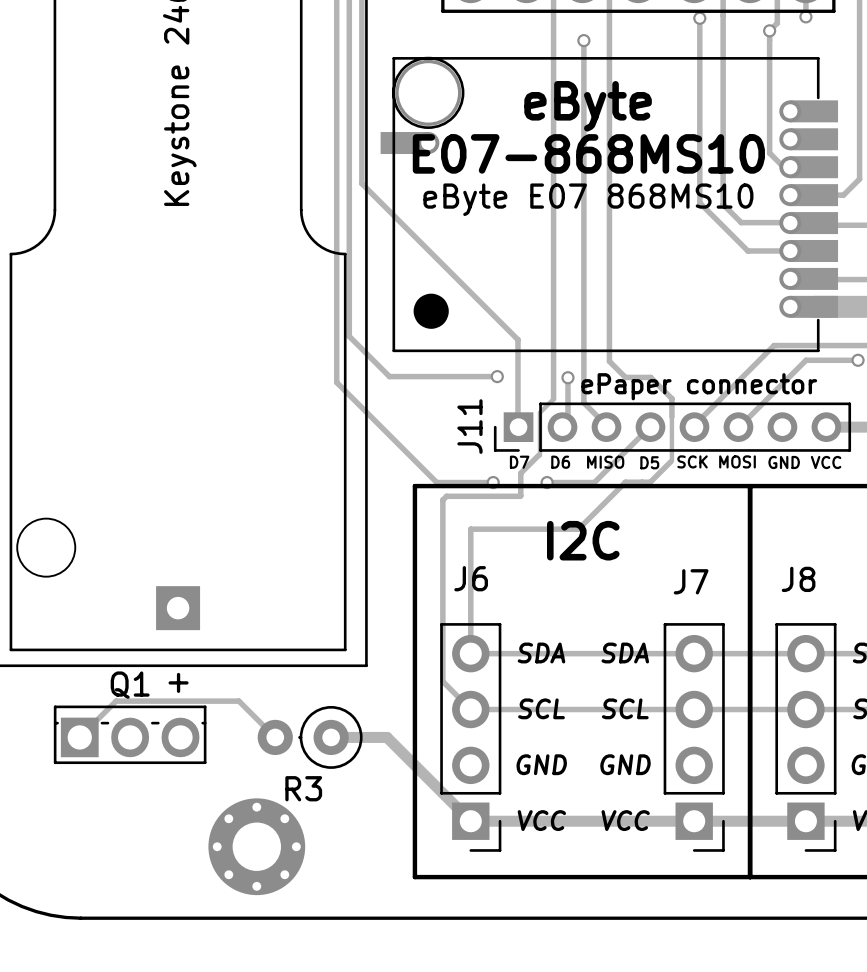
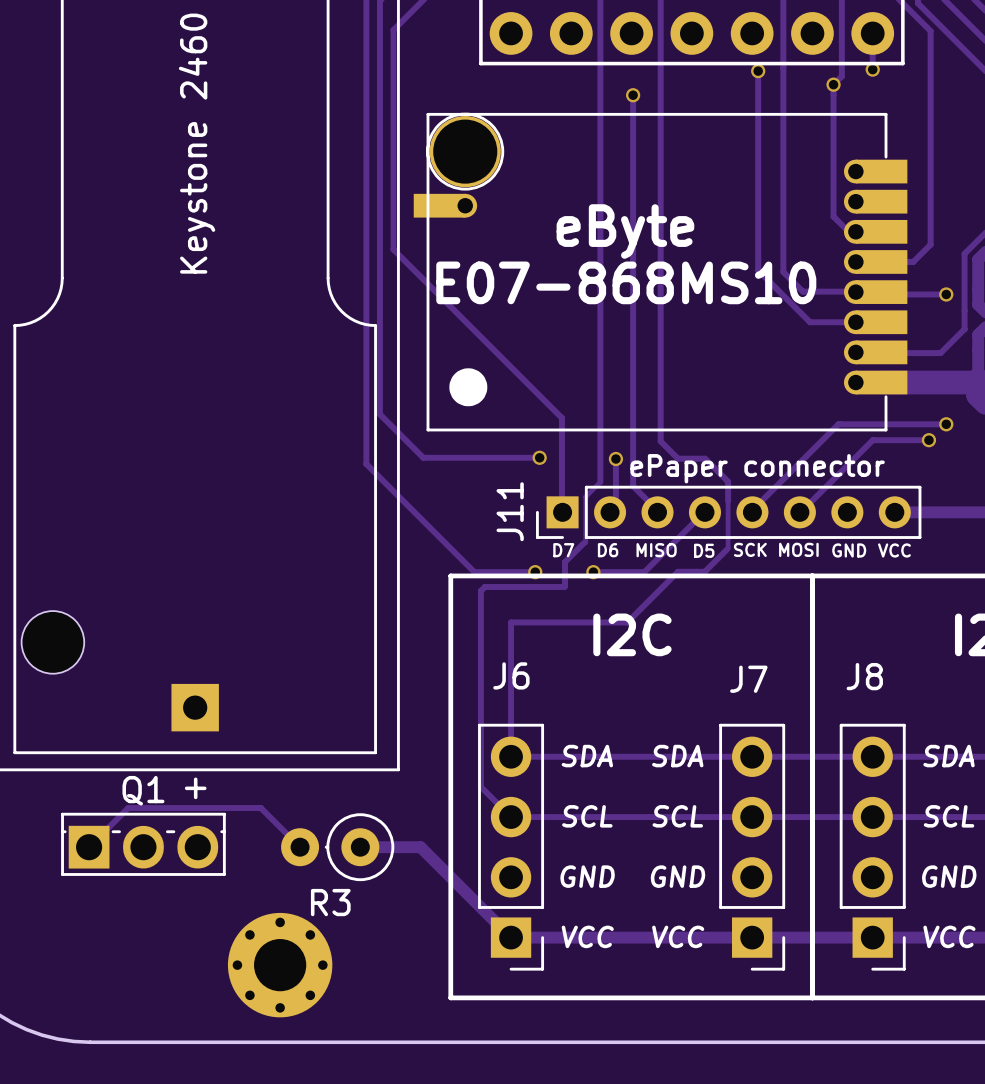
text: eByte (588, 106) -> none
text: E07-868MS10 (588, 153) -> eByte (625, 231)
part text: eByte E07 868MS10 (588, 199) -> none
text: none -> E07-868MS10 (626, 282)

